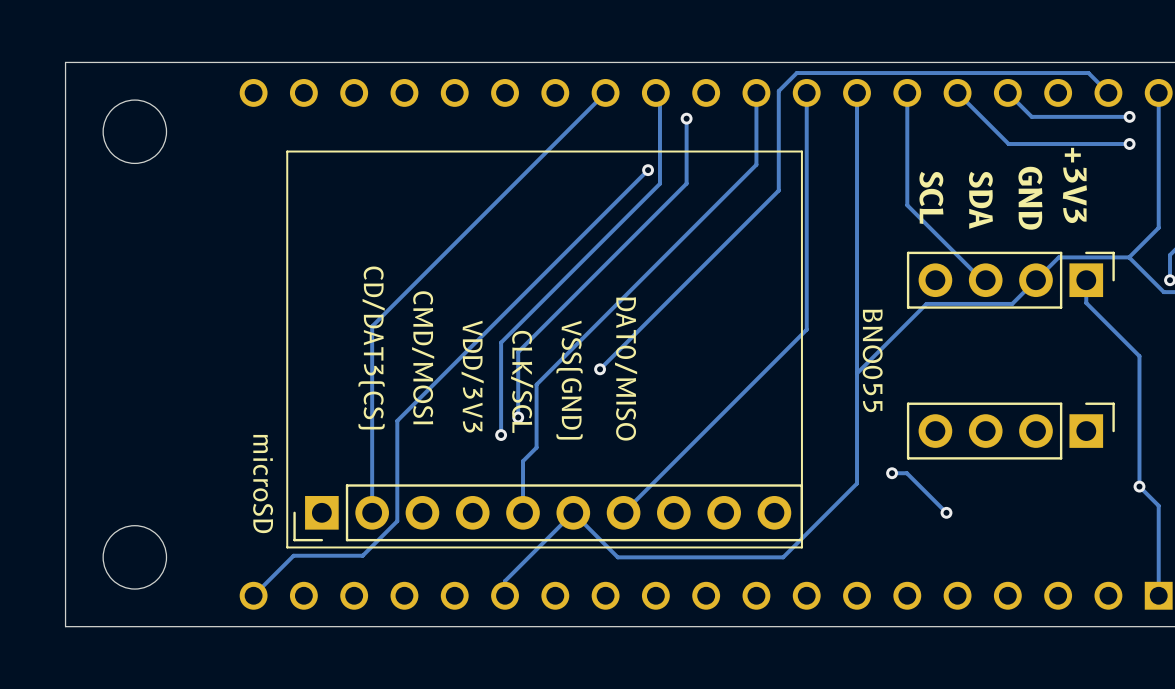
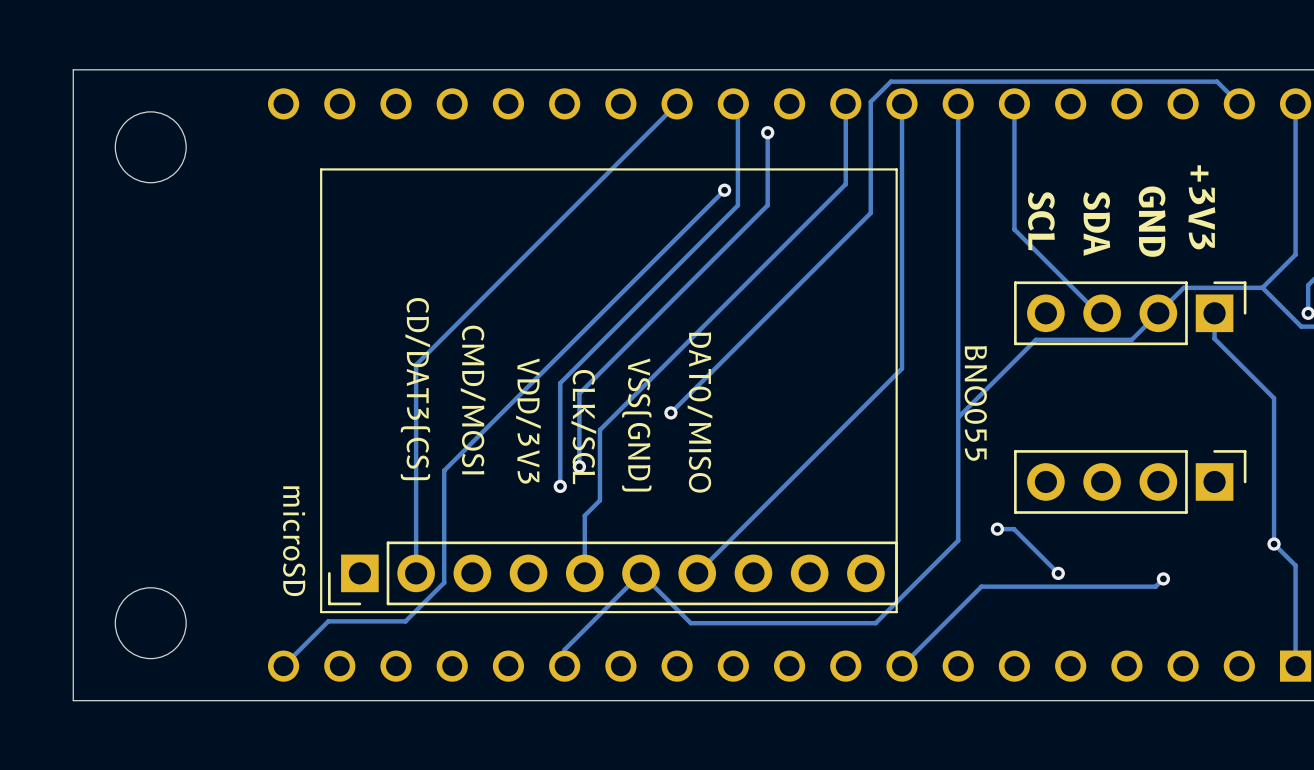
track: (957, 92) (1008, 144) (1129, 144) -> none
track: (1007, 92) (1031, 116) (1129, 116) -> none
via: (1129, 116) -> none
via: (1129, 144) -> none
track: none -> (1163, 578) (1155, 586) (981, 586) (902, 666)
via: none -> (1163, 578)

